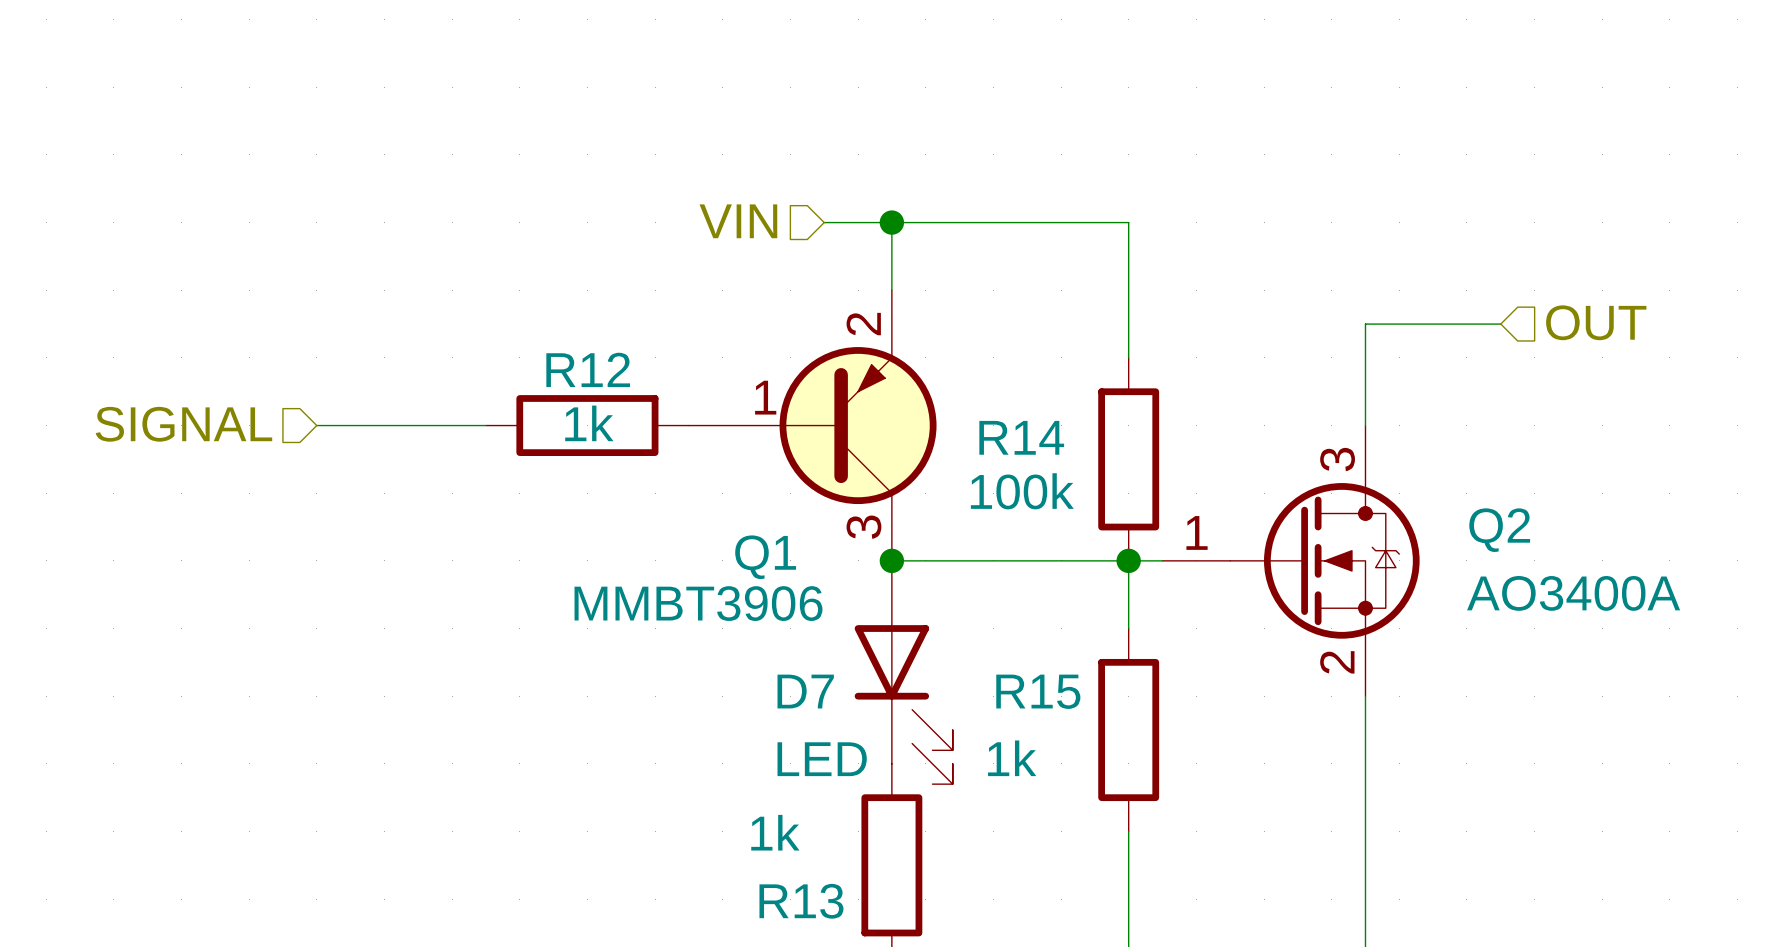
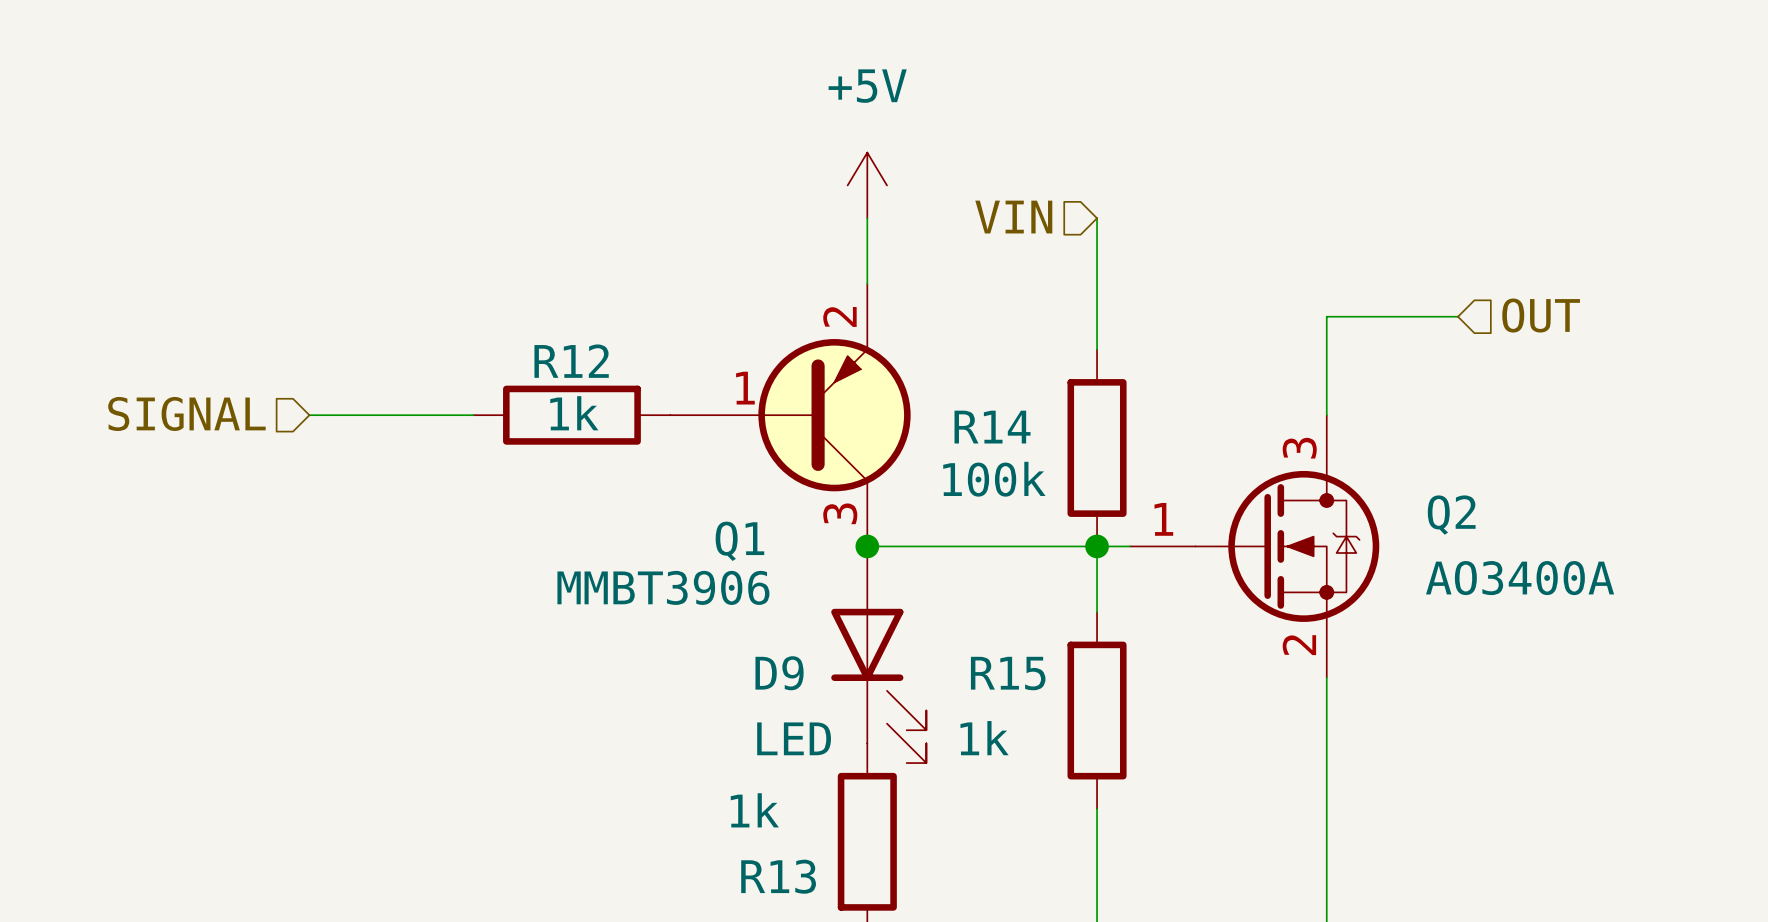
power symbol: none -> +5V (867, 185)
hierarchical label position: VIN (738, 221) -> VIN (1013, 217)
wire: (824, 222) (1128, 222) -> none
junction: (891, 222) -> none
D7 name: D7 (805, 691) -> D9 (779, 673)

